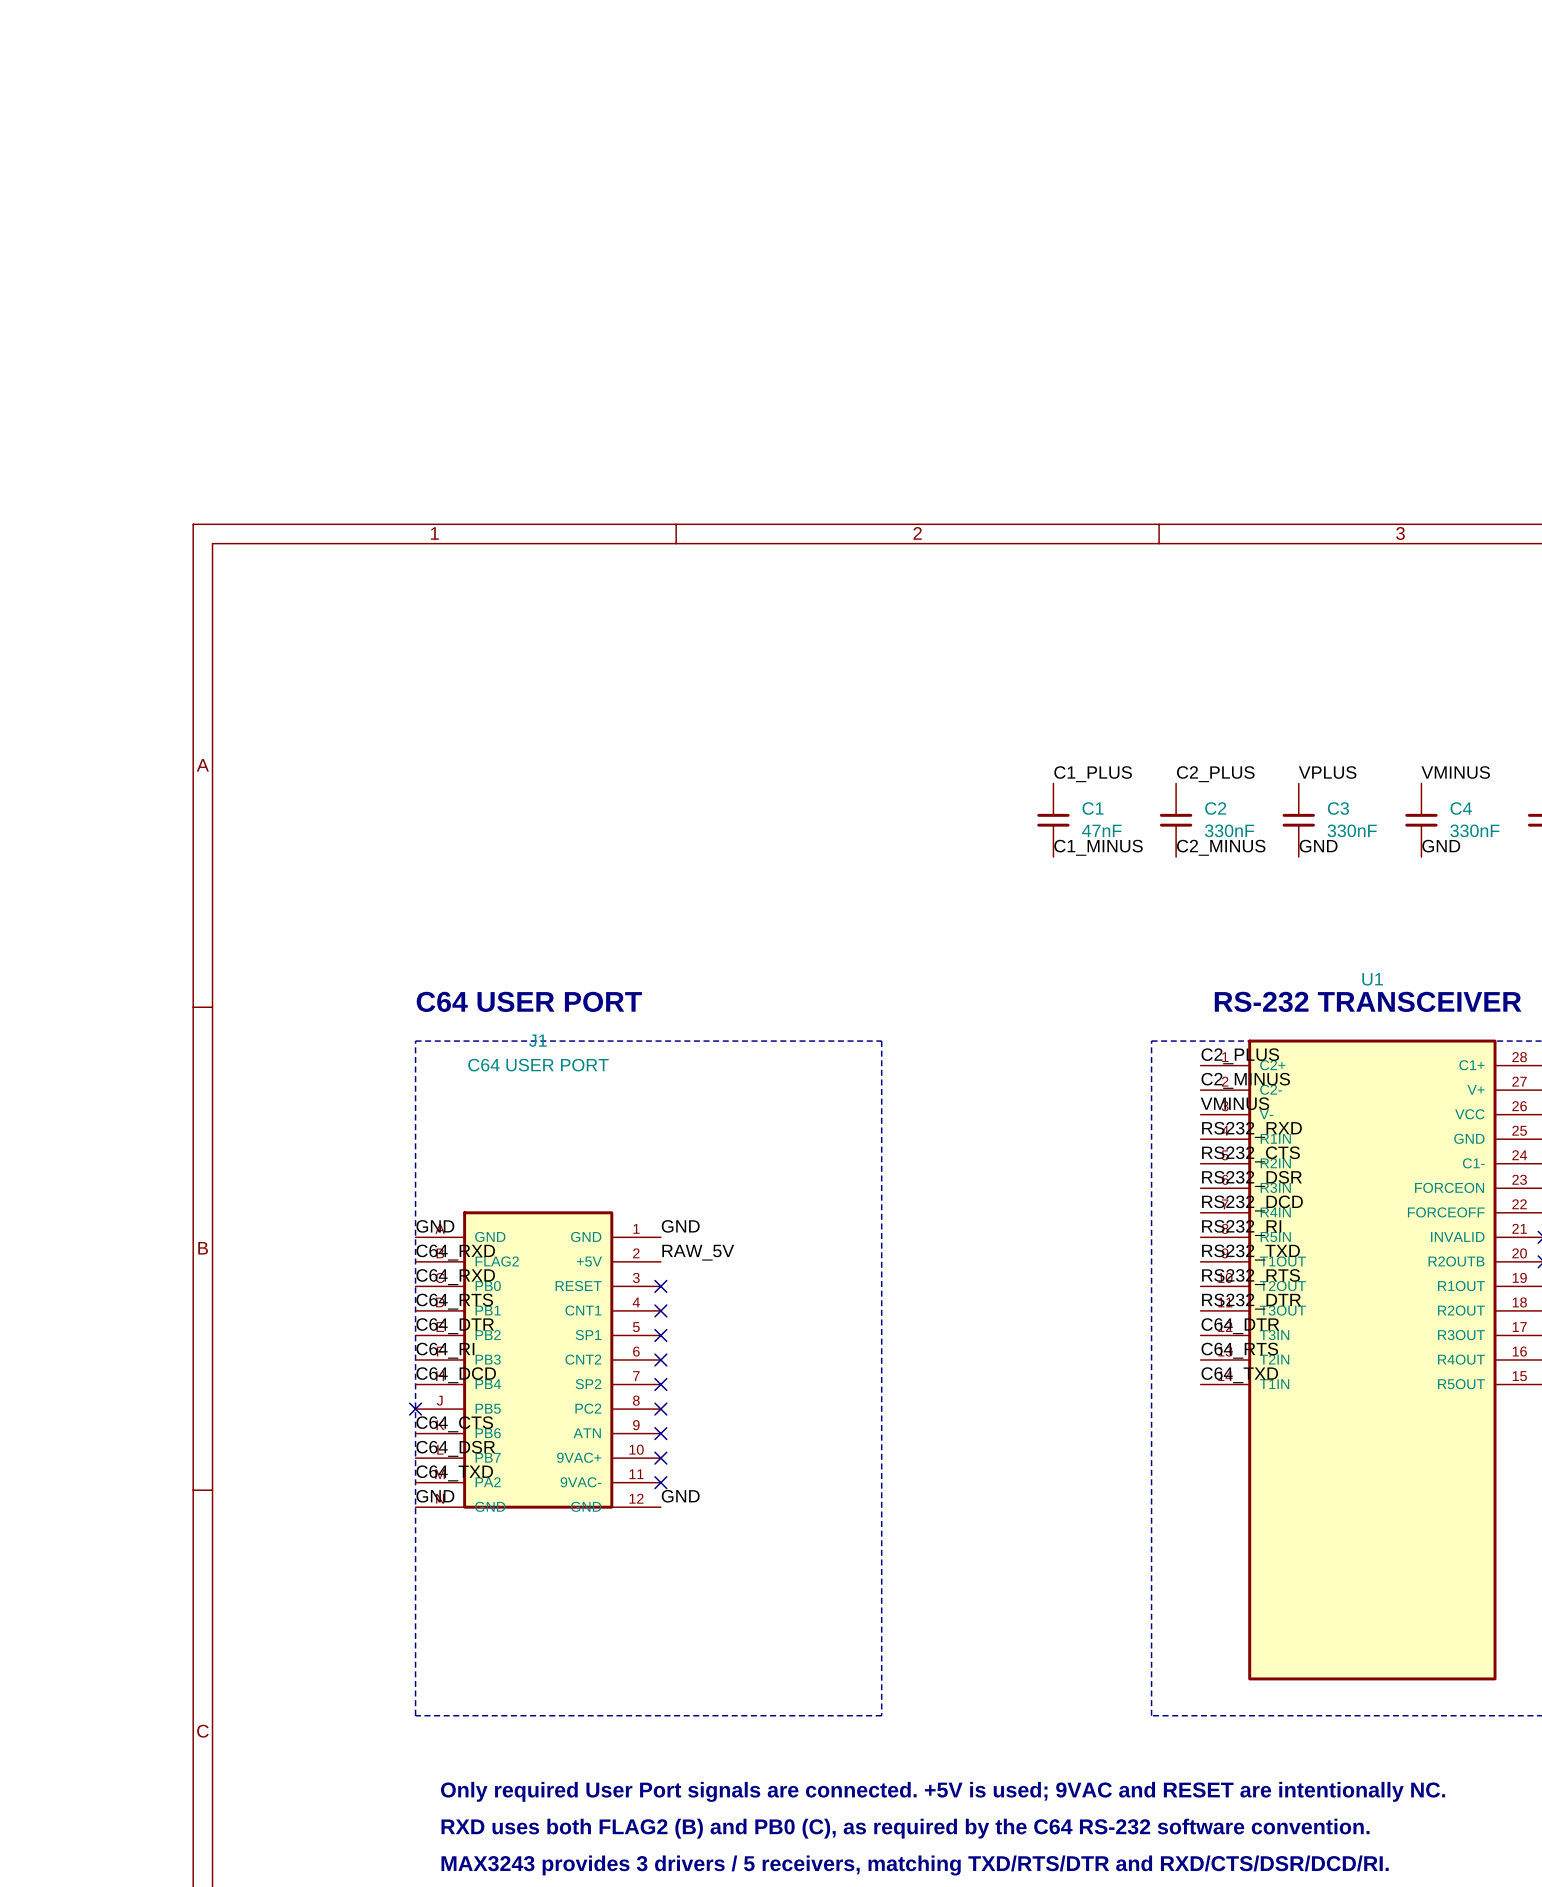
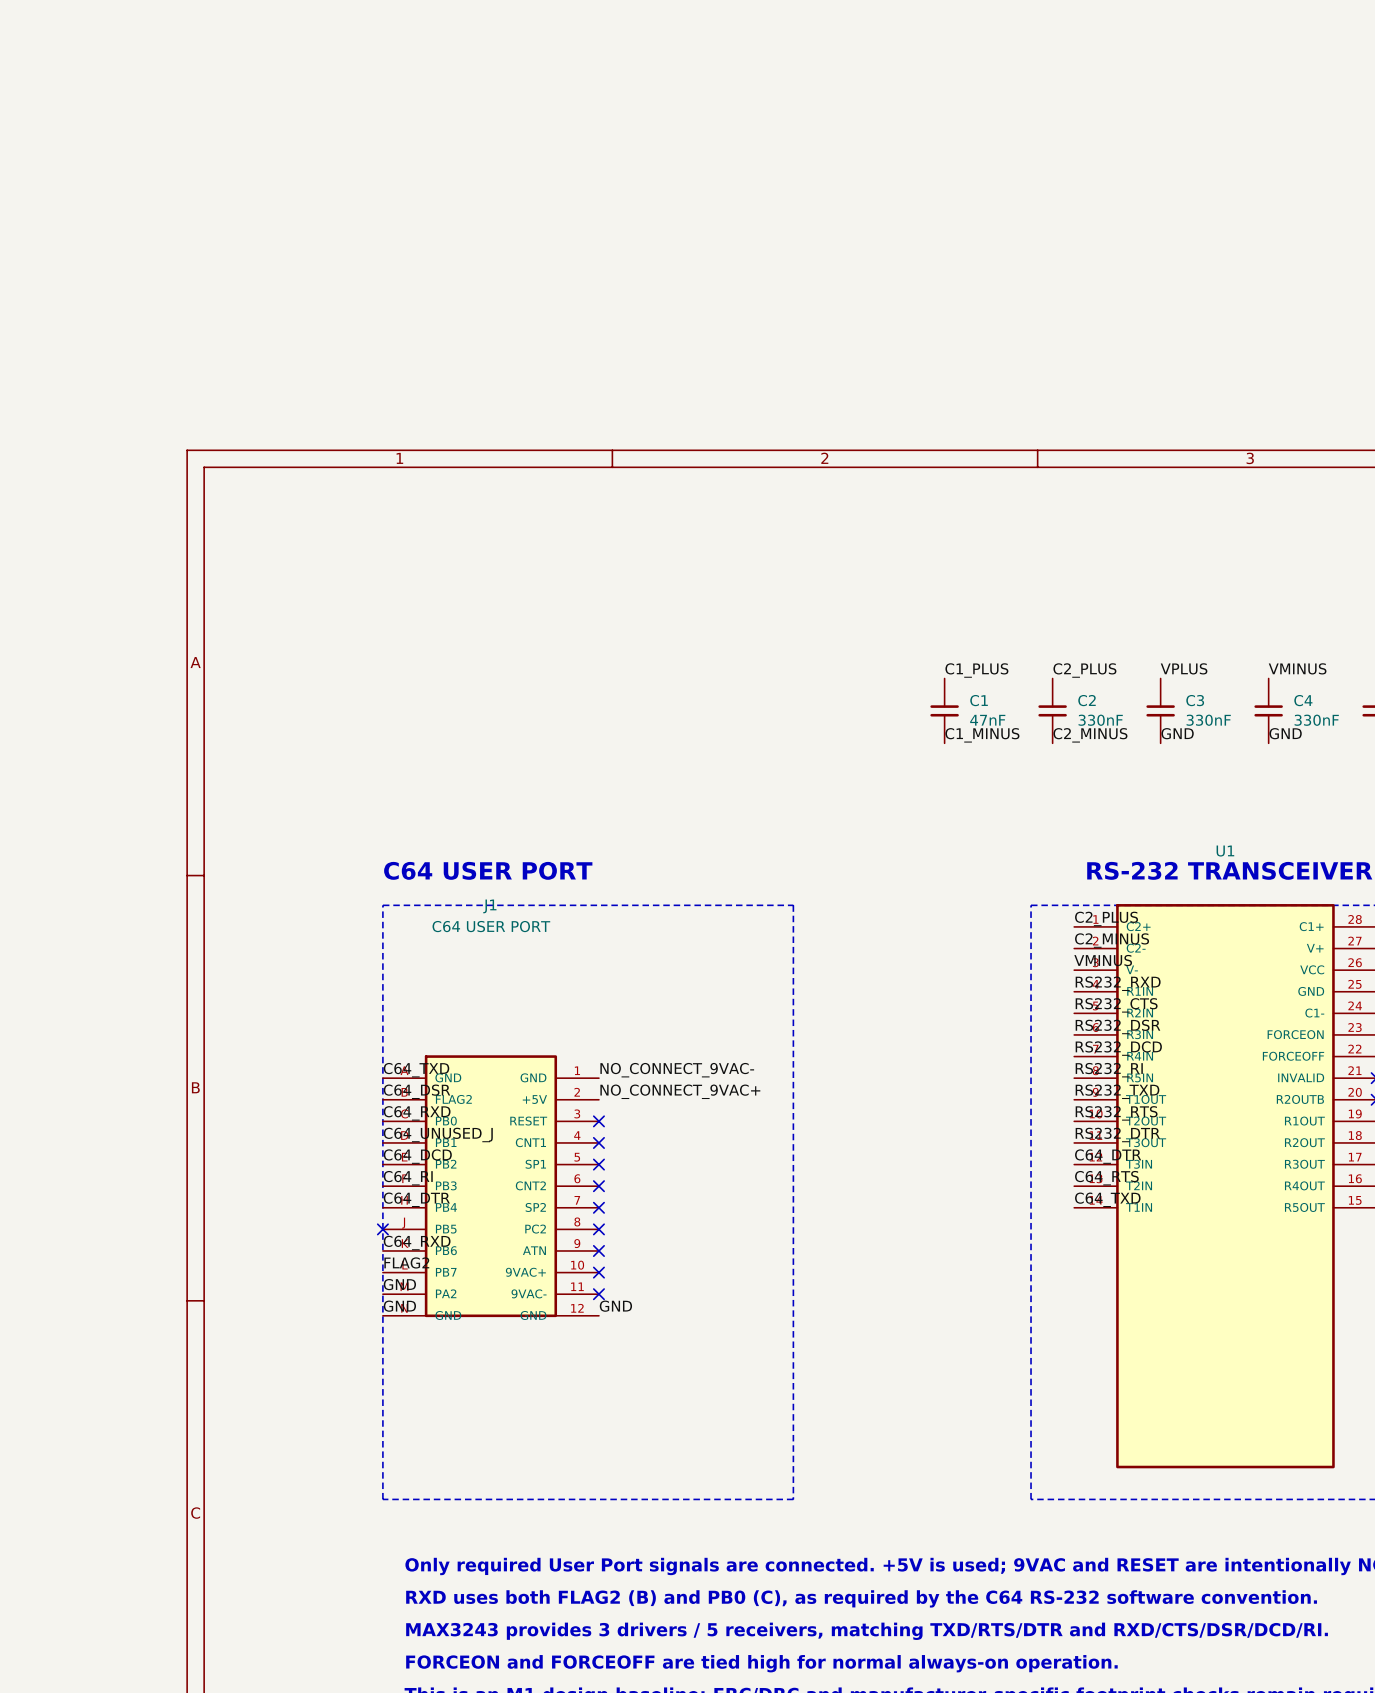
label: GND (435, 1226) -> C64_TXD (416, 1070)
label: GND (680, 1226) -> NO_CONNECT_9VAC- (677, 1070)
label: C64_RXD (455, 1252) -> C64_DSR (416, 1091)
label: RAW_5V (698, 1252) -> NO_CONNECT_9VAC+ (680, 1091)
label: C64_RTS (454, 1301) -> C64_UNUSED_J (438, 1134)
label: C64_DTR (455, 1326) -> C64_DCD (417, 1156)
label: C64_DCD (456, 1375) -> C64_DTR (416, 1199)
label: C64_CTS (454, 1424) -> C64_RXD (417, 1243)
label: C64_DSR (455, 1448) -> FLAG2 (406, 1262)
label: C64_TXD (454, 1473) -> GND (399, 1284)

